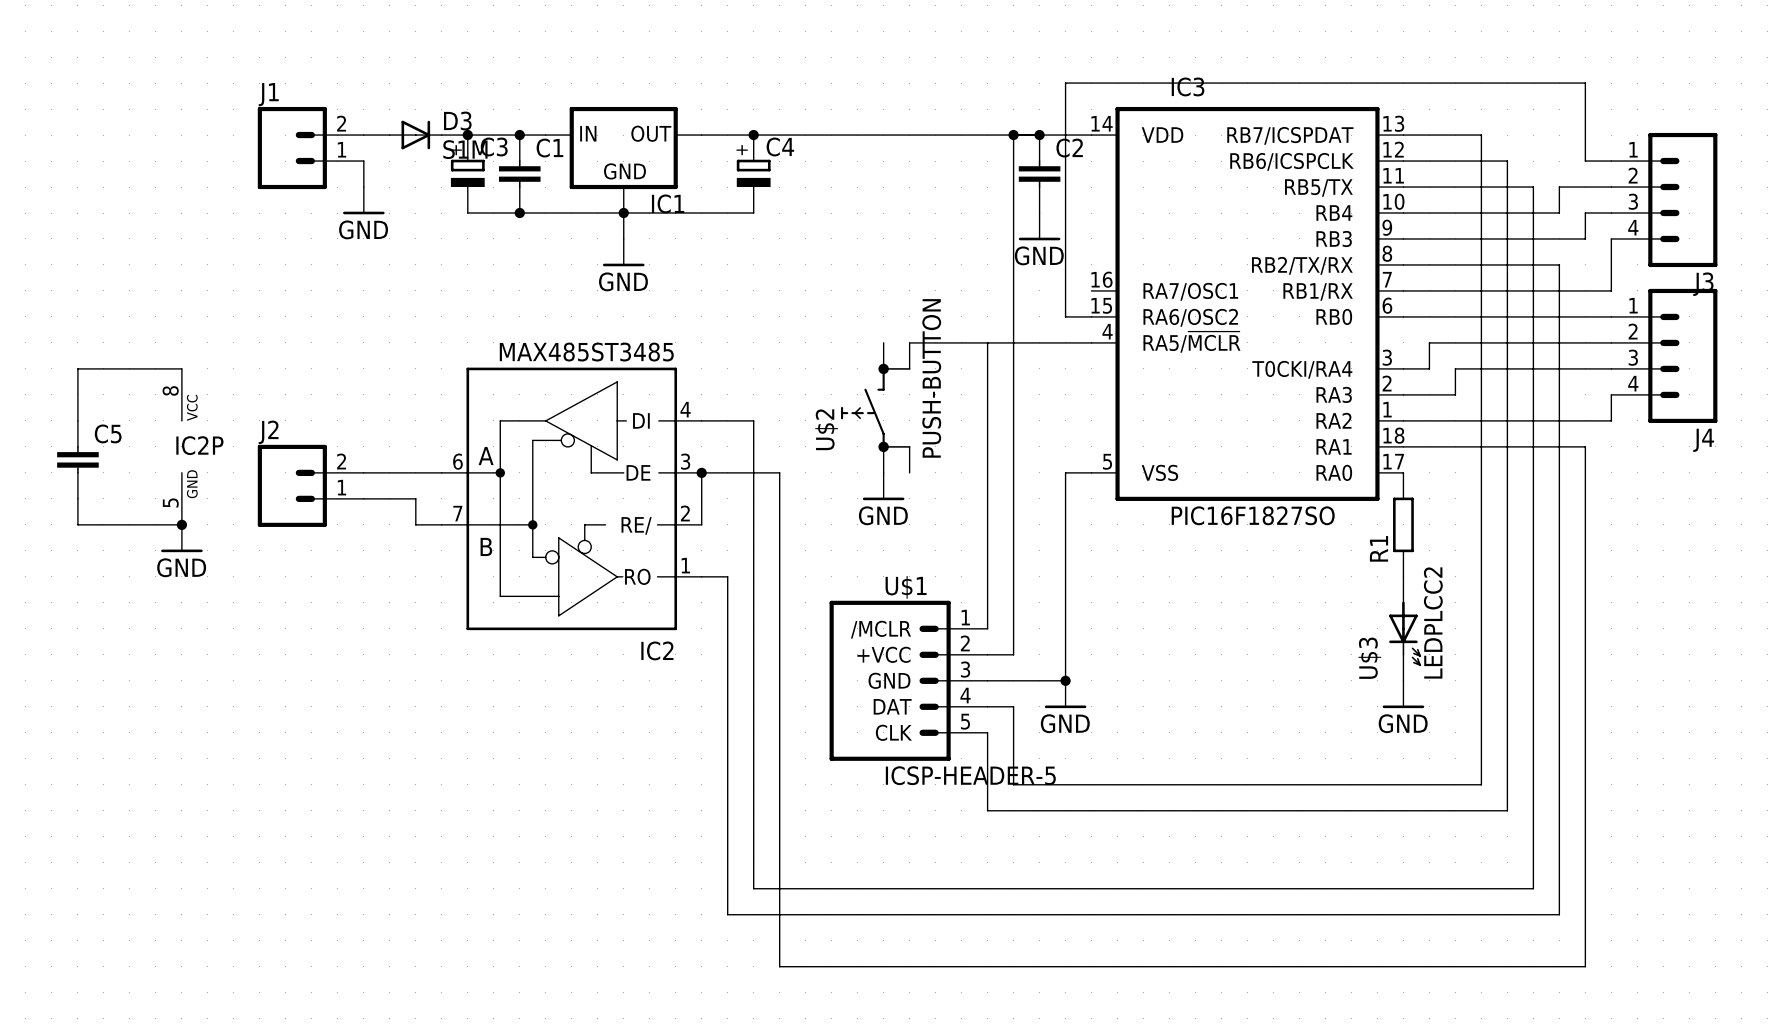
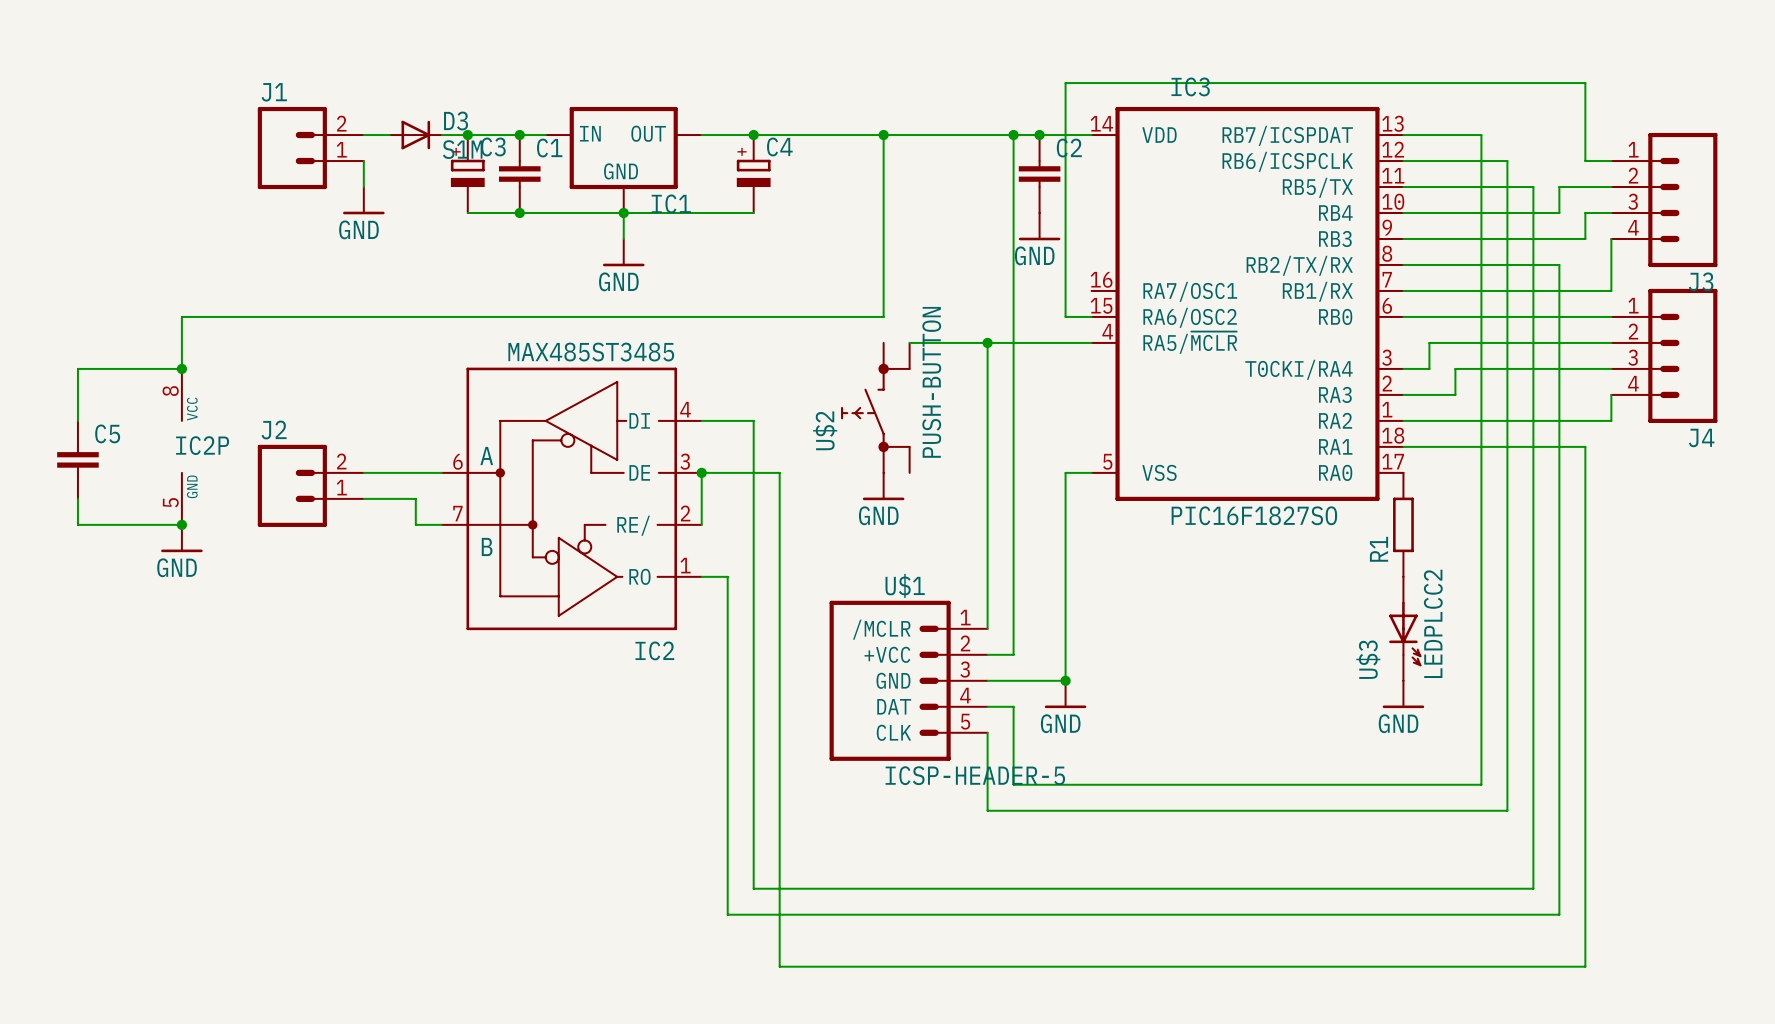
wire: none -> (883, 135) (883, 316) (181, 316) (181, 368)
junction: none -> (883, 135)
junction: none -> (987, 342)
junction: none -> (181, 368)

